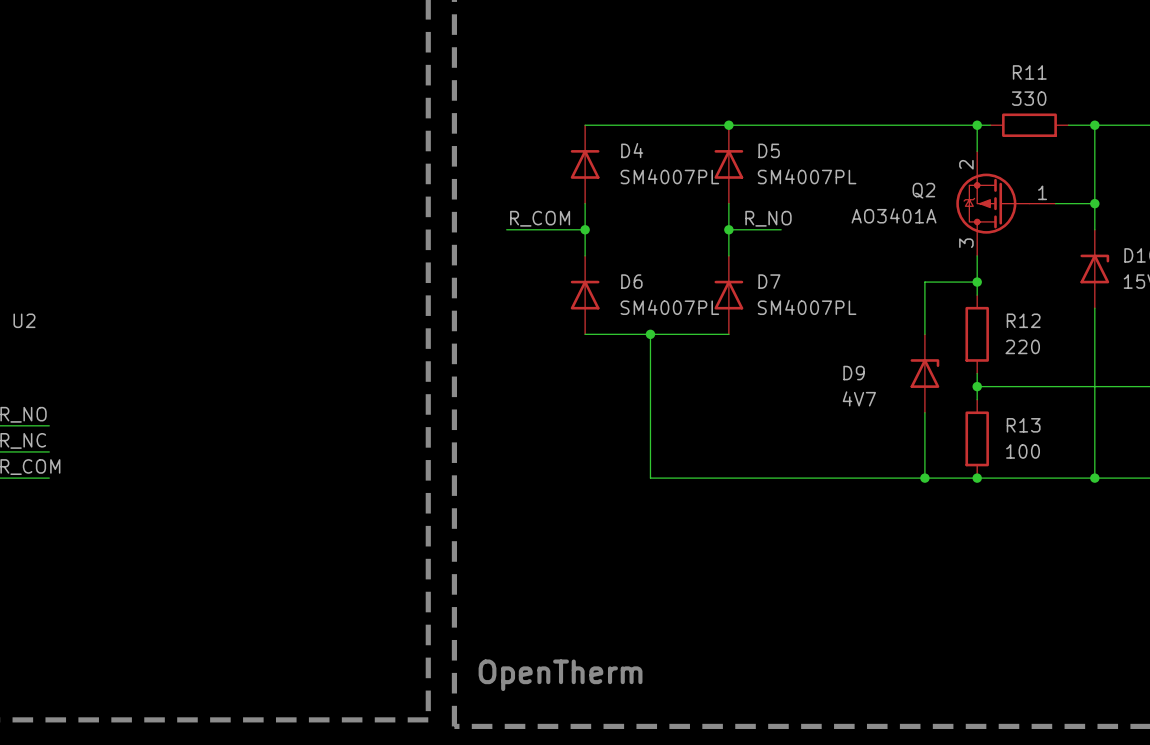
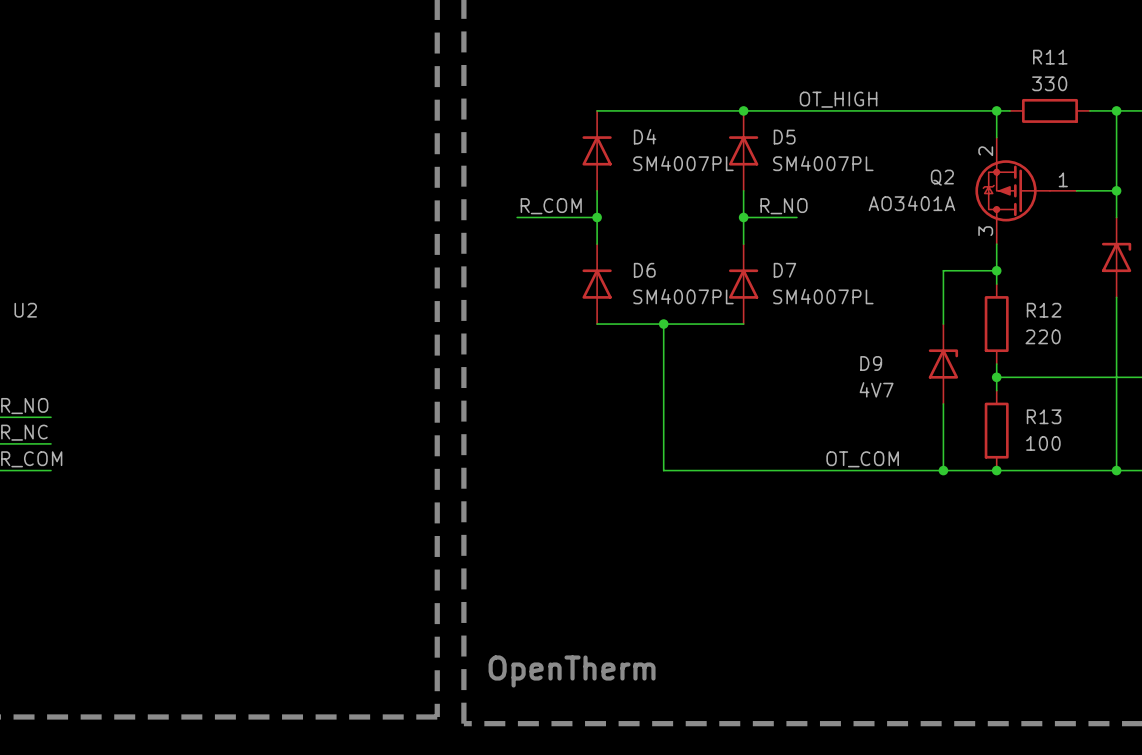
label: none -> OT_HIGH (838, 99)
label: none -> OT_COM (862, 459)

